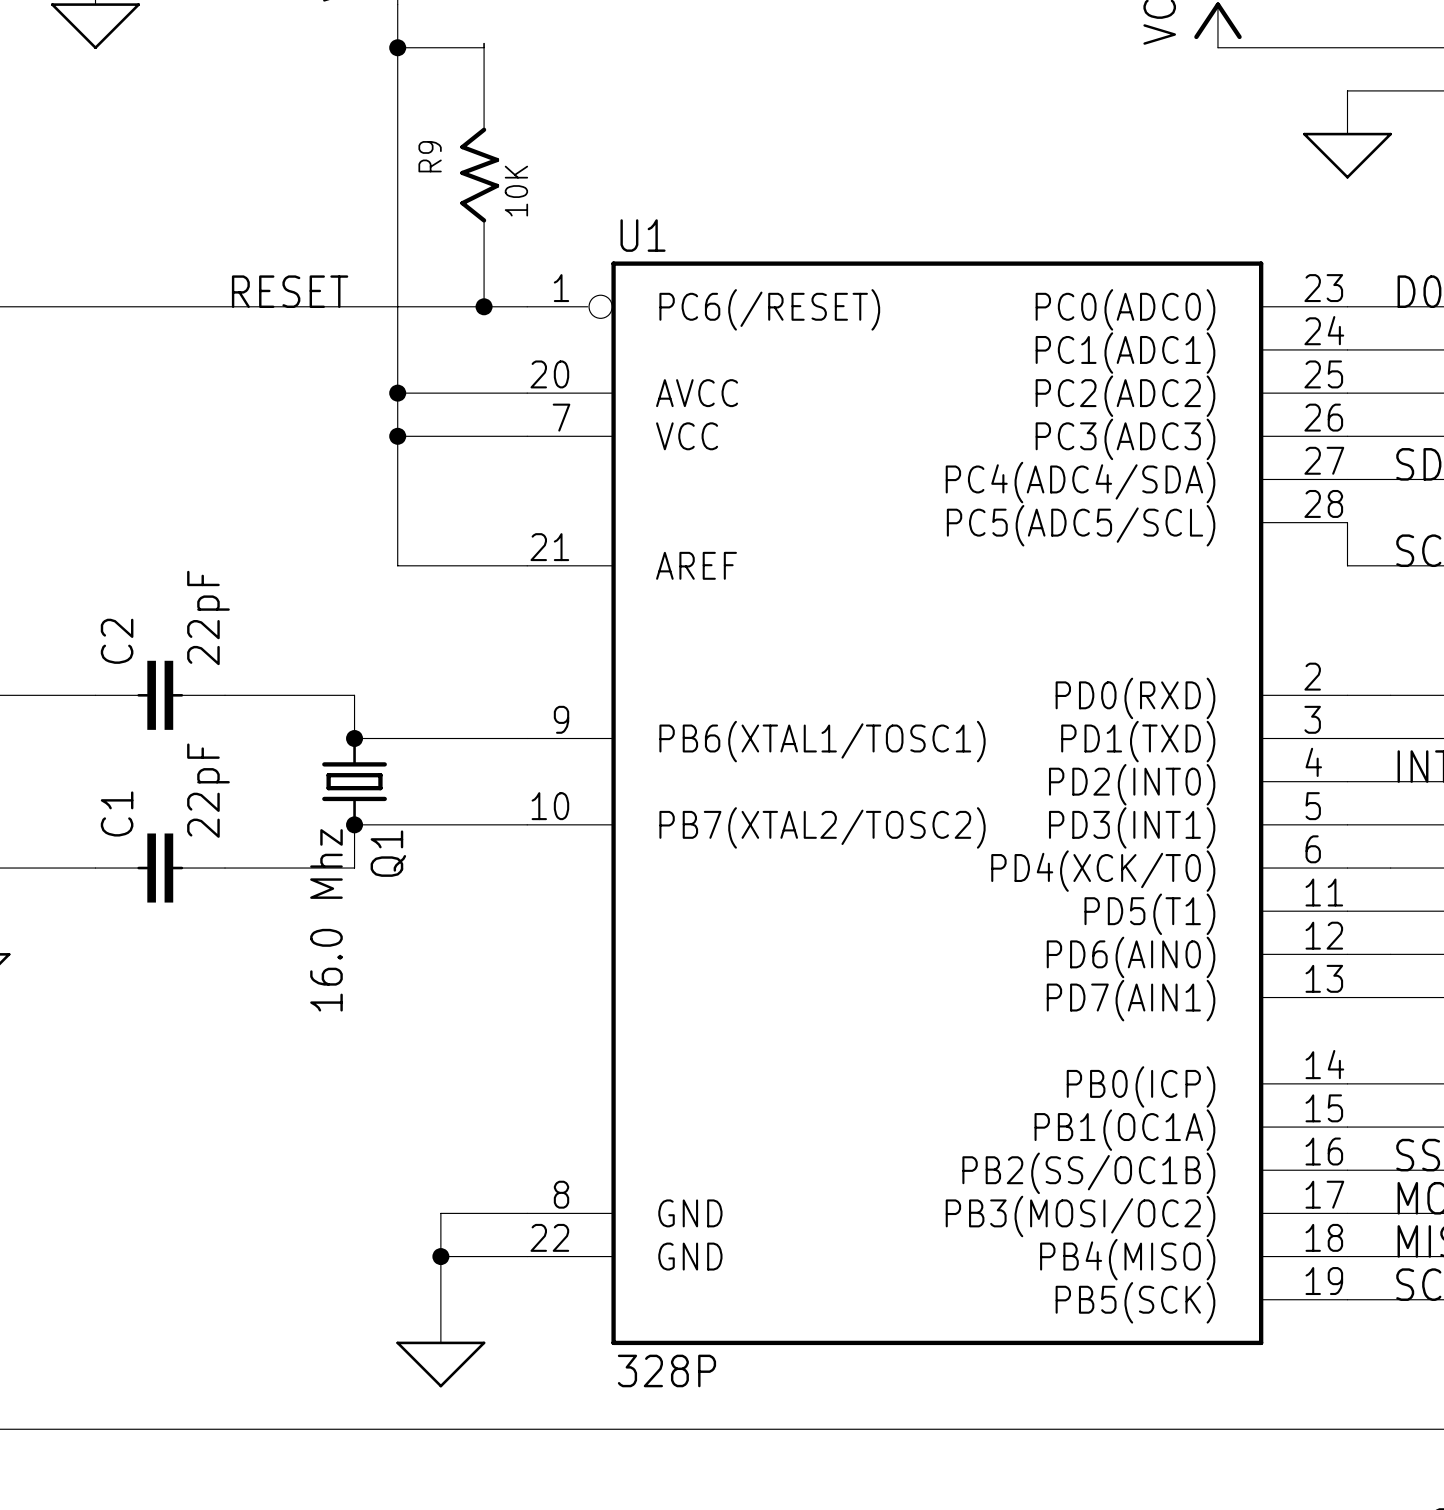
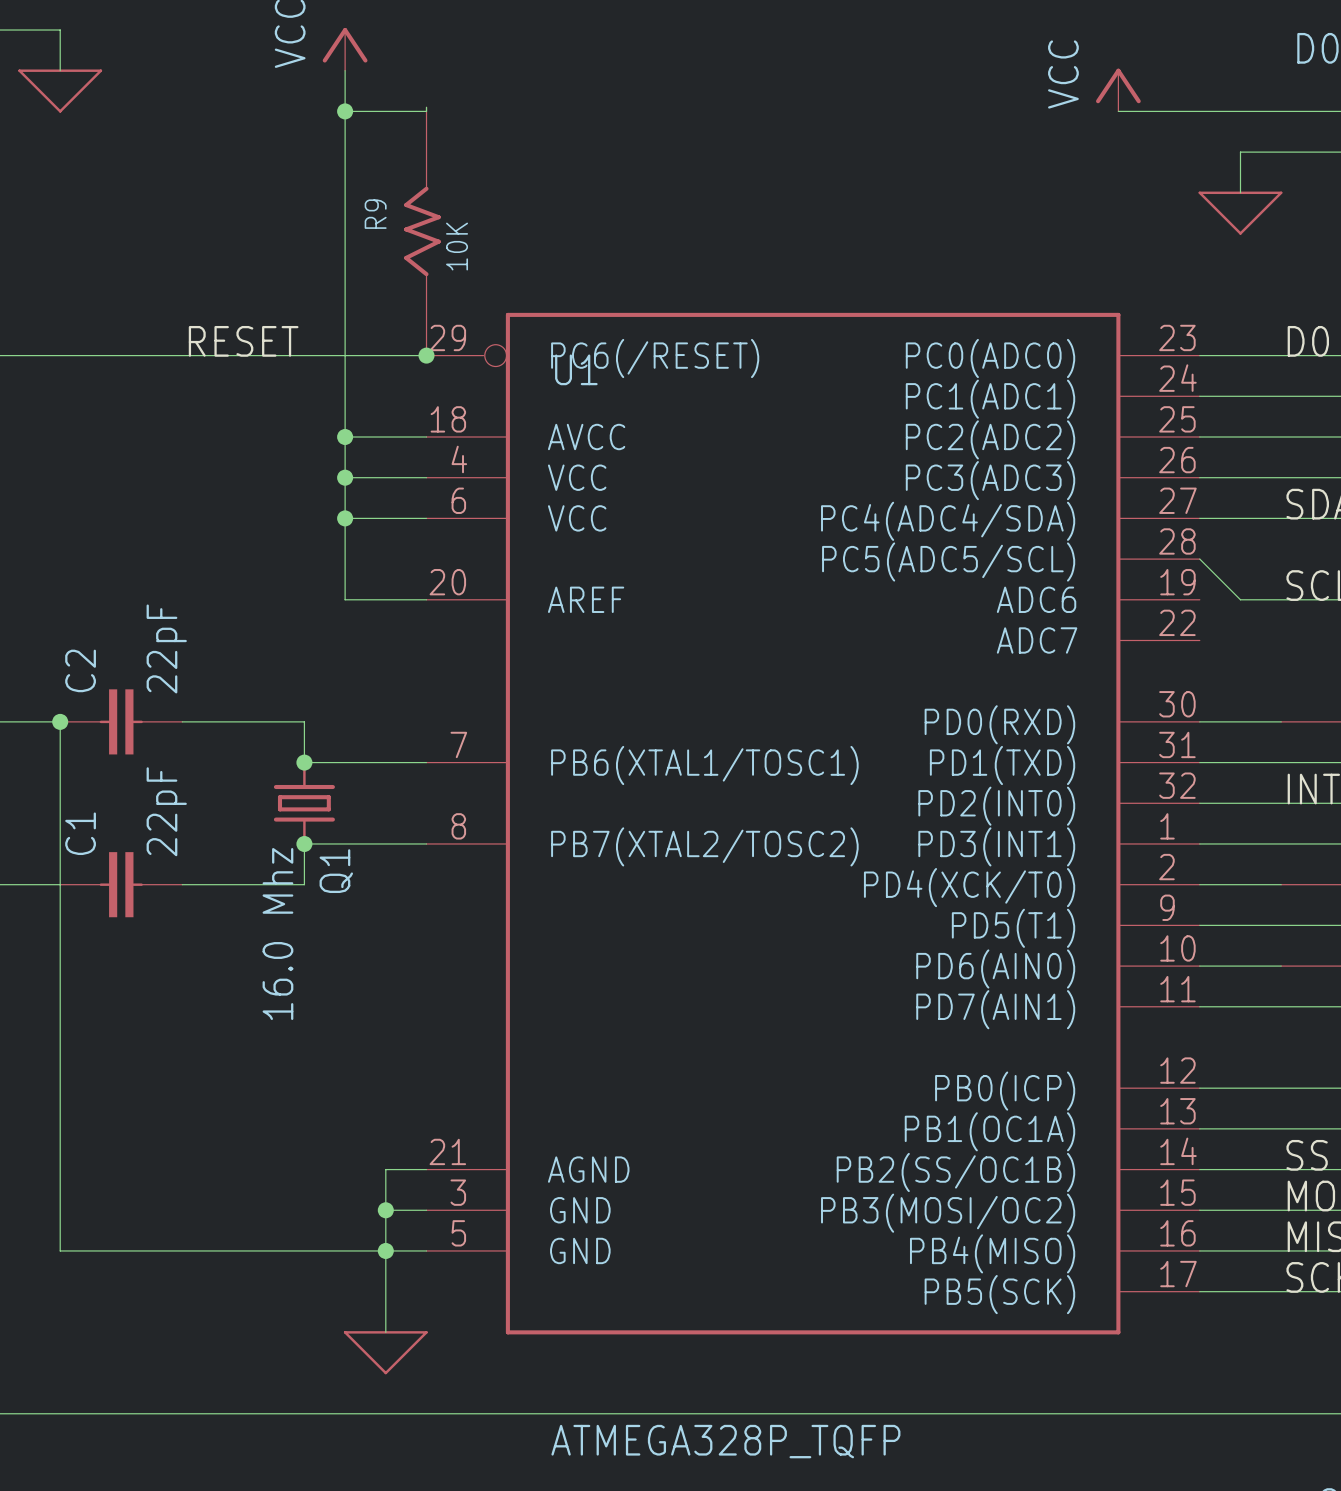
U1 name position: U1 (643, 235) -> U1 (576, 369)
U1 symbol: [527, 261, 1348, 1346] -> [426, 312, 1200, 1335]
wire: none -> (345, 518) (426, 518)
junction: none -> (345, 518)
wire: (1347, 522) (1347, 565) -> (1199, 559) (1240, 599)
wire: none -> (60, 721) (60, 1250) (385, 1250)
junction: none -> (60, 721)
wire: none -> (426, 1169) (385, 1169) (385, 1210)
junction: none -> (385, 1210)
U1 value: 328P (666, 1370) -> ATMEGA328P_TQFP (725, 1441)

